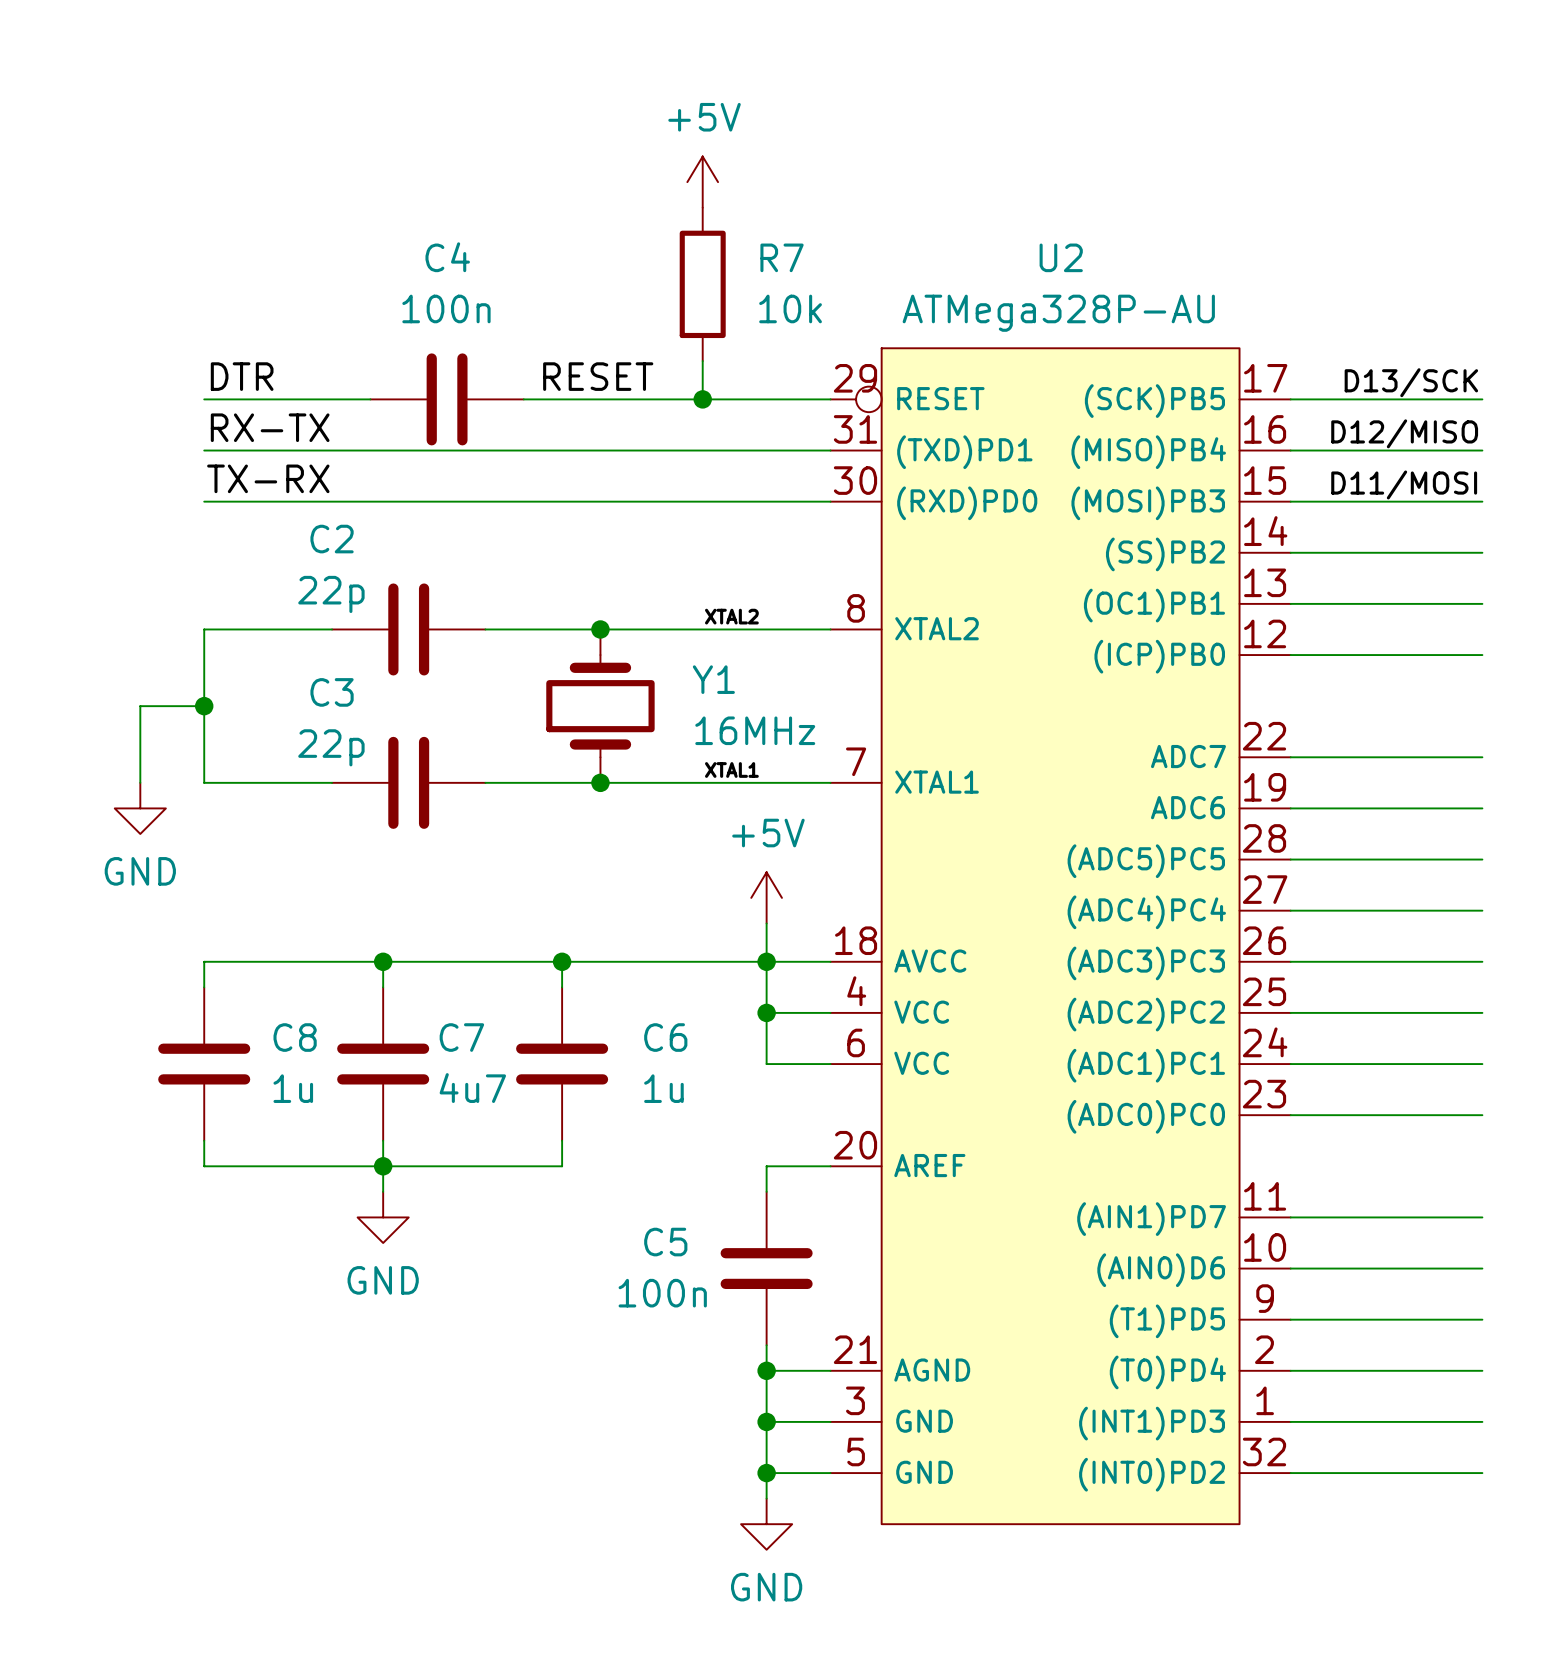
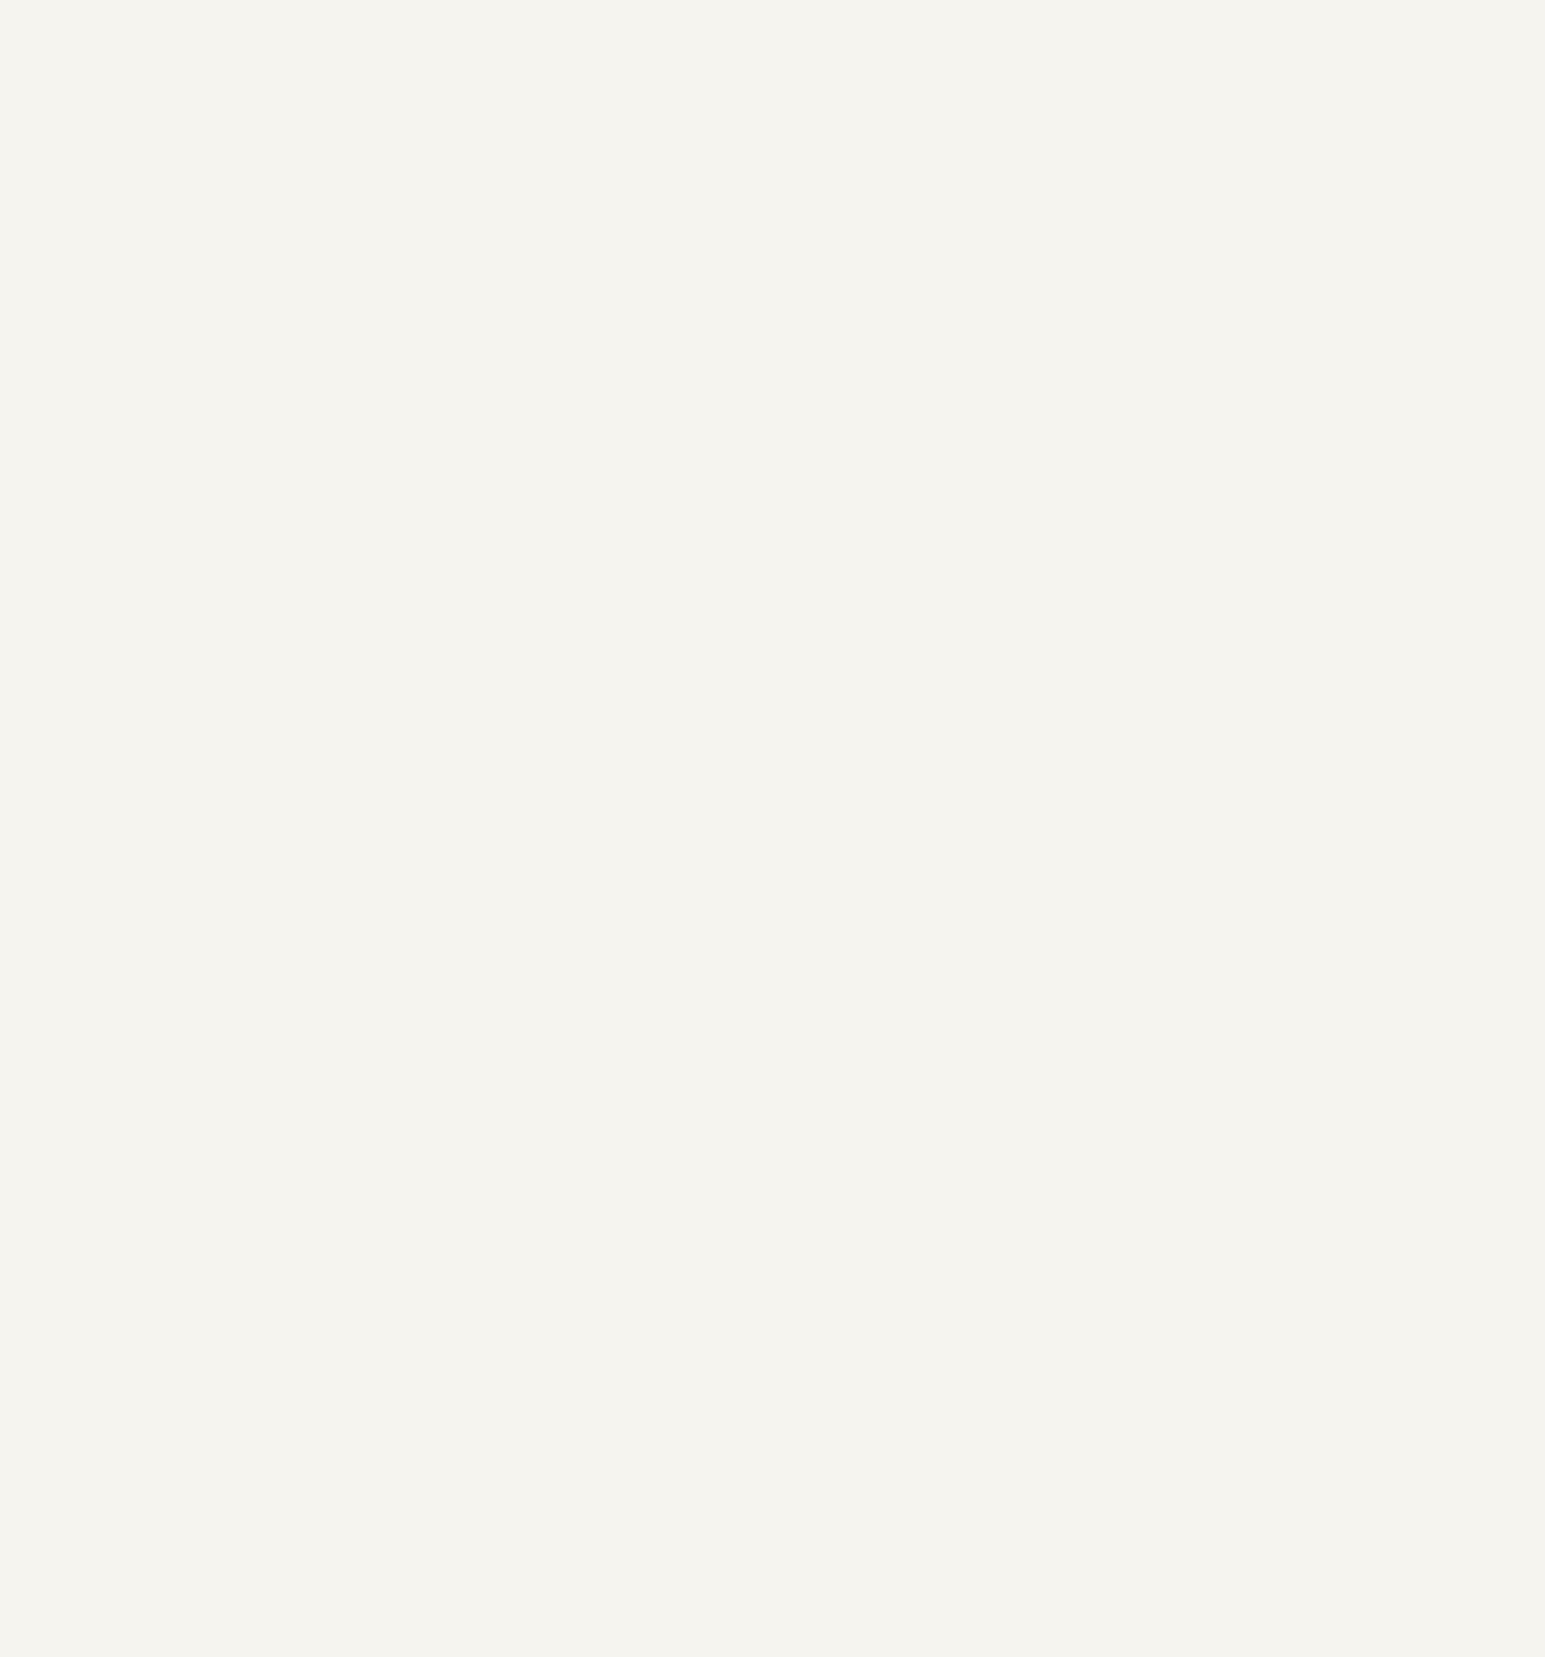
power symbol: +5V (702, 182) -> none
R7: 10k (702, 284) -> none
wire: (702, 361) (702, 399) -> none
label: DTR (242, 376) -> none
label: RESET (598, 376) -> none
label: D13/SCK (1411, 382) -> none
wire: (204, 399) (370, 399) -> none
C4: 100n (447, 399) -> none
wire: (523, 399) (830, 399) -> none
junction: (702, 399) -> none
wire: (1290, 399) (1482, 399) -> none
label: RX-TX (270, 427) -> none
label: D12/MISO (1404, 433) -> none
wire: (204, 450) (830, 450) -> none
wire: (1290, 450) (1482, 450) -> none
label: TX-RX (268, 478) -> none
label: D11/MOSI (1404, 484) -> none
wire: (204, 501) (830, 501) -> none
wire: (1290, 501) (1482, 501) -> none
wire: (1290, 552) (1482, 552) -> none
wire: (1290, 603) (1482, 603) -> none
label: XTAL2 (731, 616) -> none
wire: (332, 629) (204, 629) (204, 782) (332, 782) -> none
C2: 22p (408, 629) -> none
wire: (485, 629) (830, 629) -> none
junction: (600, 629) -> none
wire: (1290, 655) (1482, 655) -> none
wire: (204, 706) (140, 706) (140, 782) -> none
junction: (204, 706) -> none
Y1: 16MHz (600, 706) -> none
wire: (1290, 757) (1482, 757) -> none
label: XTAL1 (731, 769) -> none
C3: 22p (408, 782) -> none
wire: (485, 782) (830, 782) -> none
junction: (600, 782) -> none
power symbol: GND (140, 808) -> none
wire: (1290, 808) (1482, 808) -> none
wire: (1290, 859) (1482, 859) -> none
power symbol: +5V (766, 897) -> none
wire: (1290, 910) (1482, 910) -> none
wire: (766, 923) (766, 1064) (830, 1064) -> none
U2: ATMega328P-AU (1060, 936) -> none
wire: (383, 961) (383, 987) -> none
junction: (383, 961) -> none
wire: (562, 961) (562, 987) -> none
junction: (562, 961) -> none
junction: (766, 961) -> none
wire: (830, 961) (204, 961) (204, 987) -> none
wire: (1290, 961) (1482, 961) -> none
wire: (766, 1012) (830, 1012) -> none
junction: (766, 1012) -> none
wire: (1290, 1012) (1482, 1012) -> none
C8: 1u (204, 1064) -> none
C7: 4u7 (383, 1064) -> none
C6: 1u (562, 1064) -> none
wire: (1290, 1064) (1482, 1064) -> none
wire: (1290, 1115) (1482, 1115) -> none
wire: (204, 1140) (204, 1166) (562, 1166) (562, 1140) -> none
wire: (383, 1140) (383, 1191) -> none
junction: (383, 1166) -> none
wire: (830, 1166) (766, 1166) (766, 1191) -> none
power symbol: GND (383, 1217) -> none
wire: (1290, 1217) (1482, 1217) -> none
C5: 100n (766, 1268) -> none
wire: (1290, 1268) (1482, 1268) -> none
wire: (1290, 1319) (1482, 1319) -> none
wire: (766, 1345) (766, 1498) -> none
wire: (766, 1370) (830, 1370) -> none
junction: (766, 1370) -> none
wire: (1290, 1370) (1482, 1370) -> none
wire: (766, 1421) (830, 1421) -> none
junction: (766, 1421) -> none
wire: (1290, 1421) (1482, 1421) -> none
wire: (766, 1473) (830, 1473) -> none
junction: (766, 1473) -> none
wire: (1290, 1473) (1482, 1473) -> none
power symbol: GND (766, 1524) -> none

